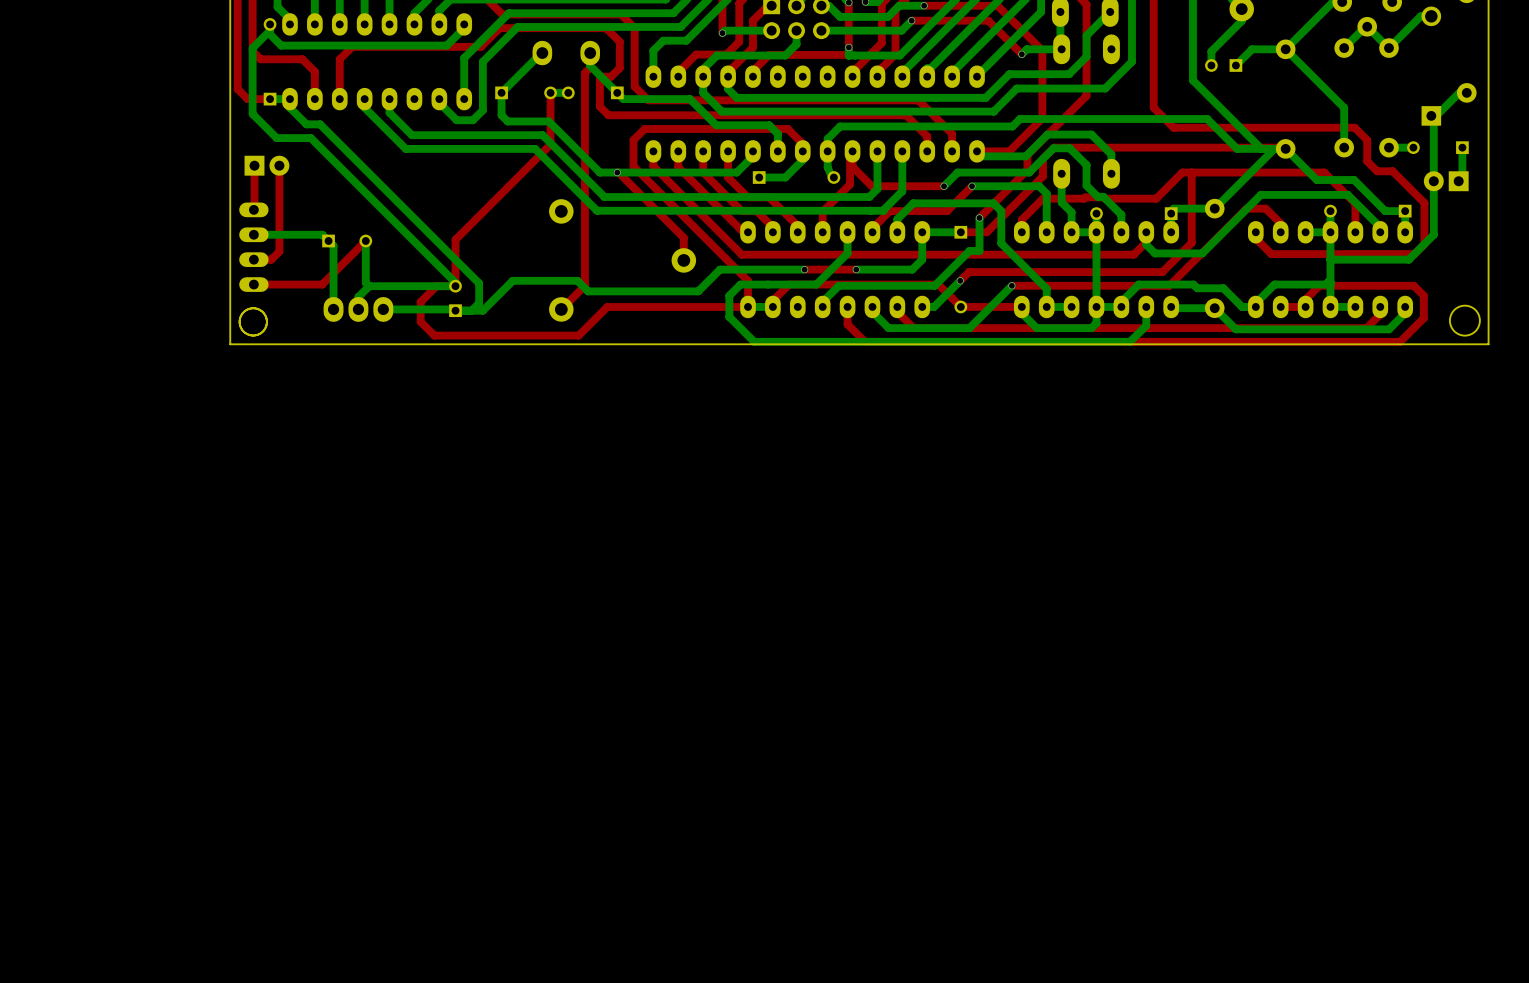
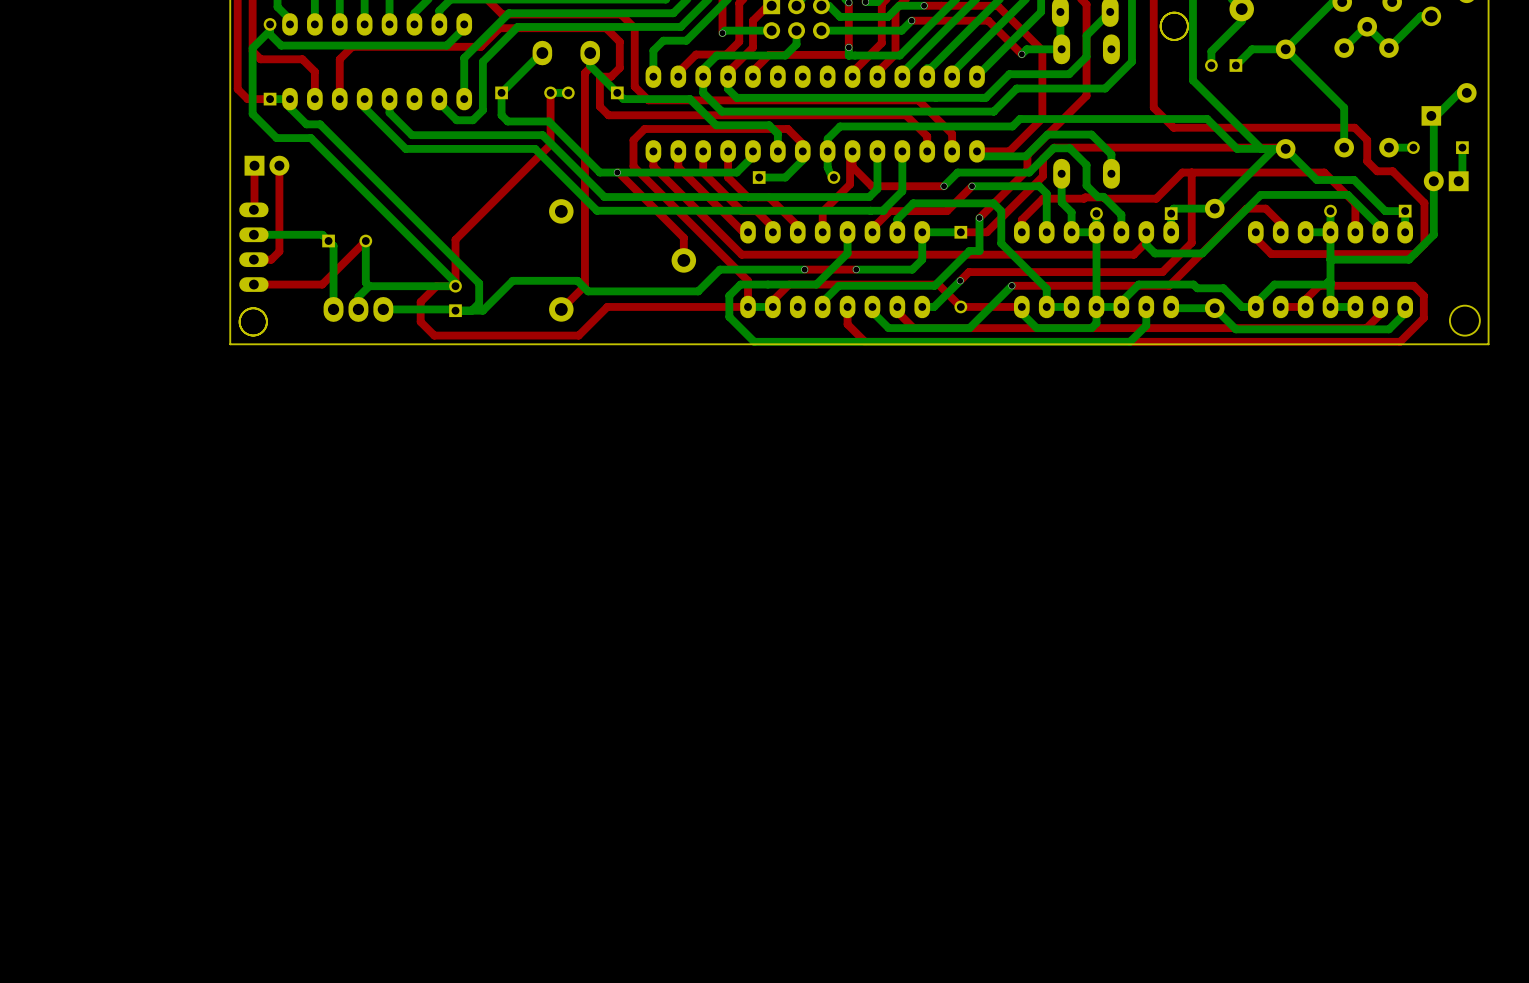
round board edge: none -> [1159, 11, 1189, 41]

